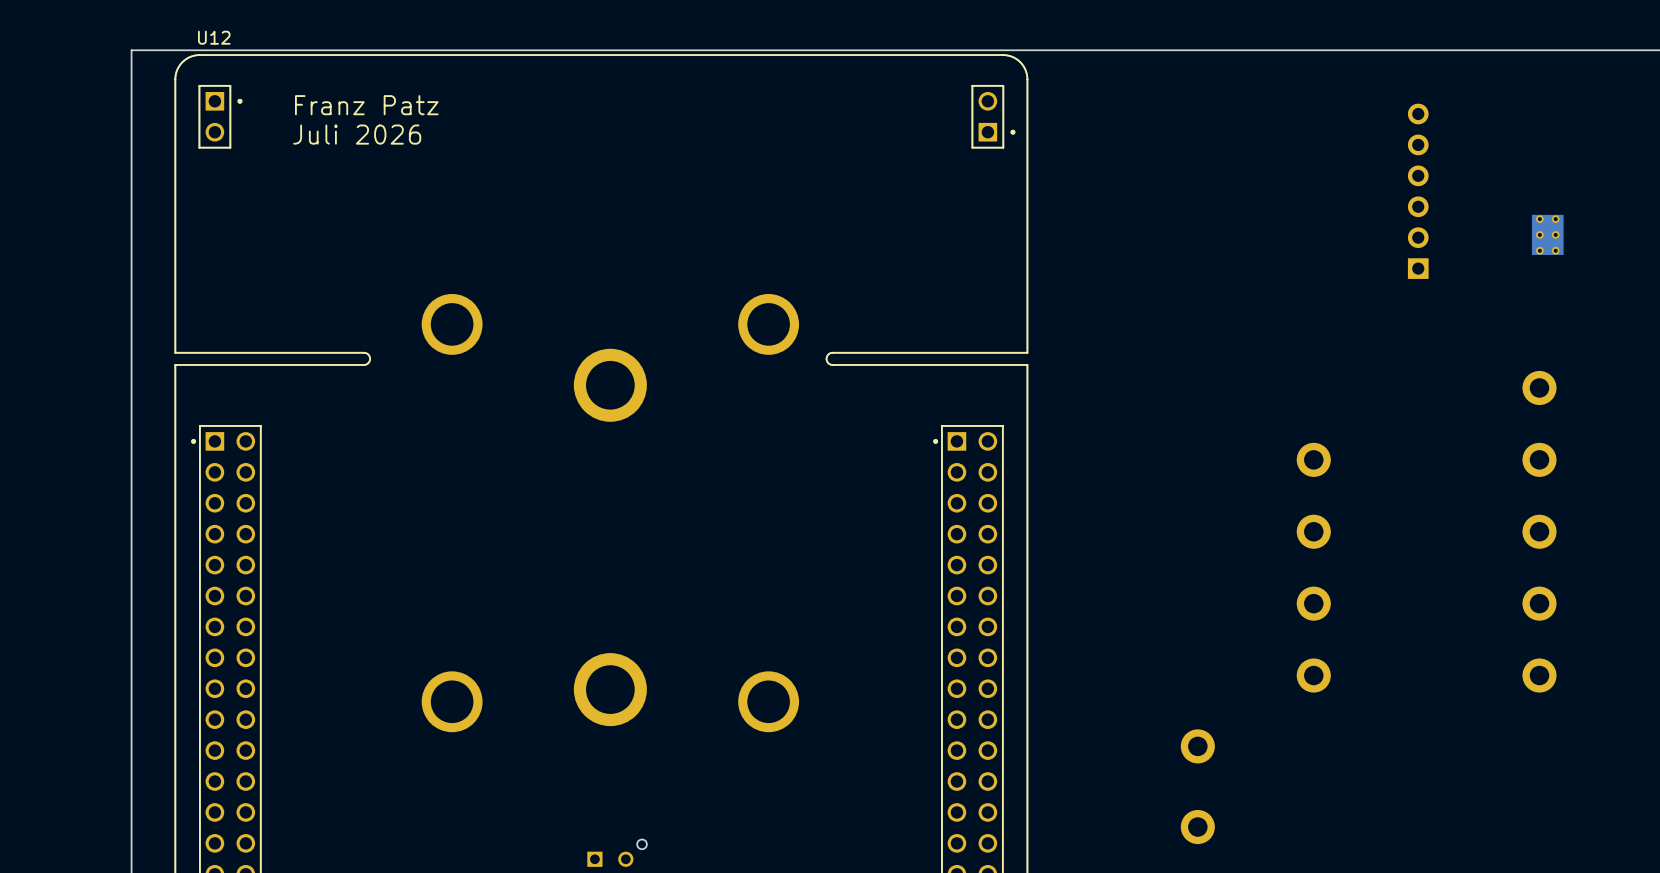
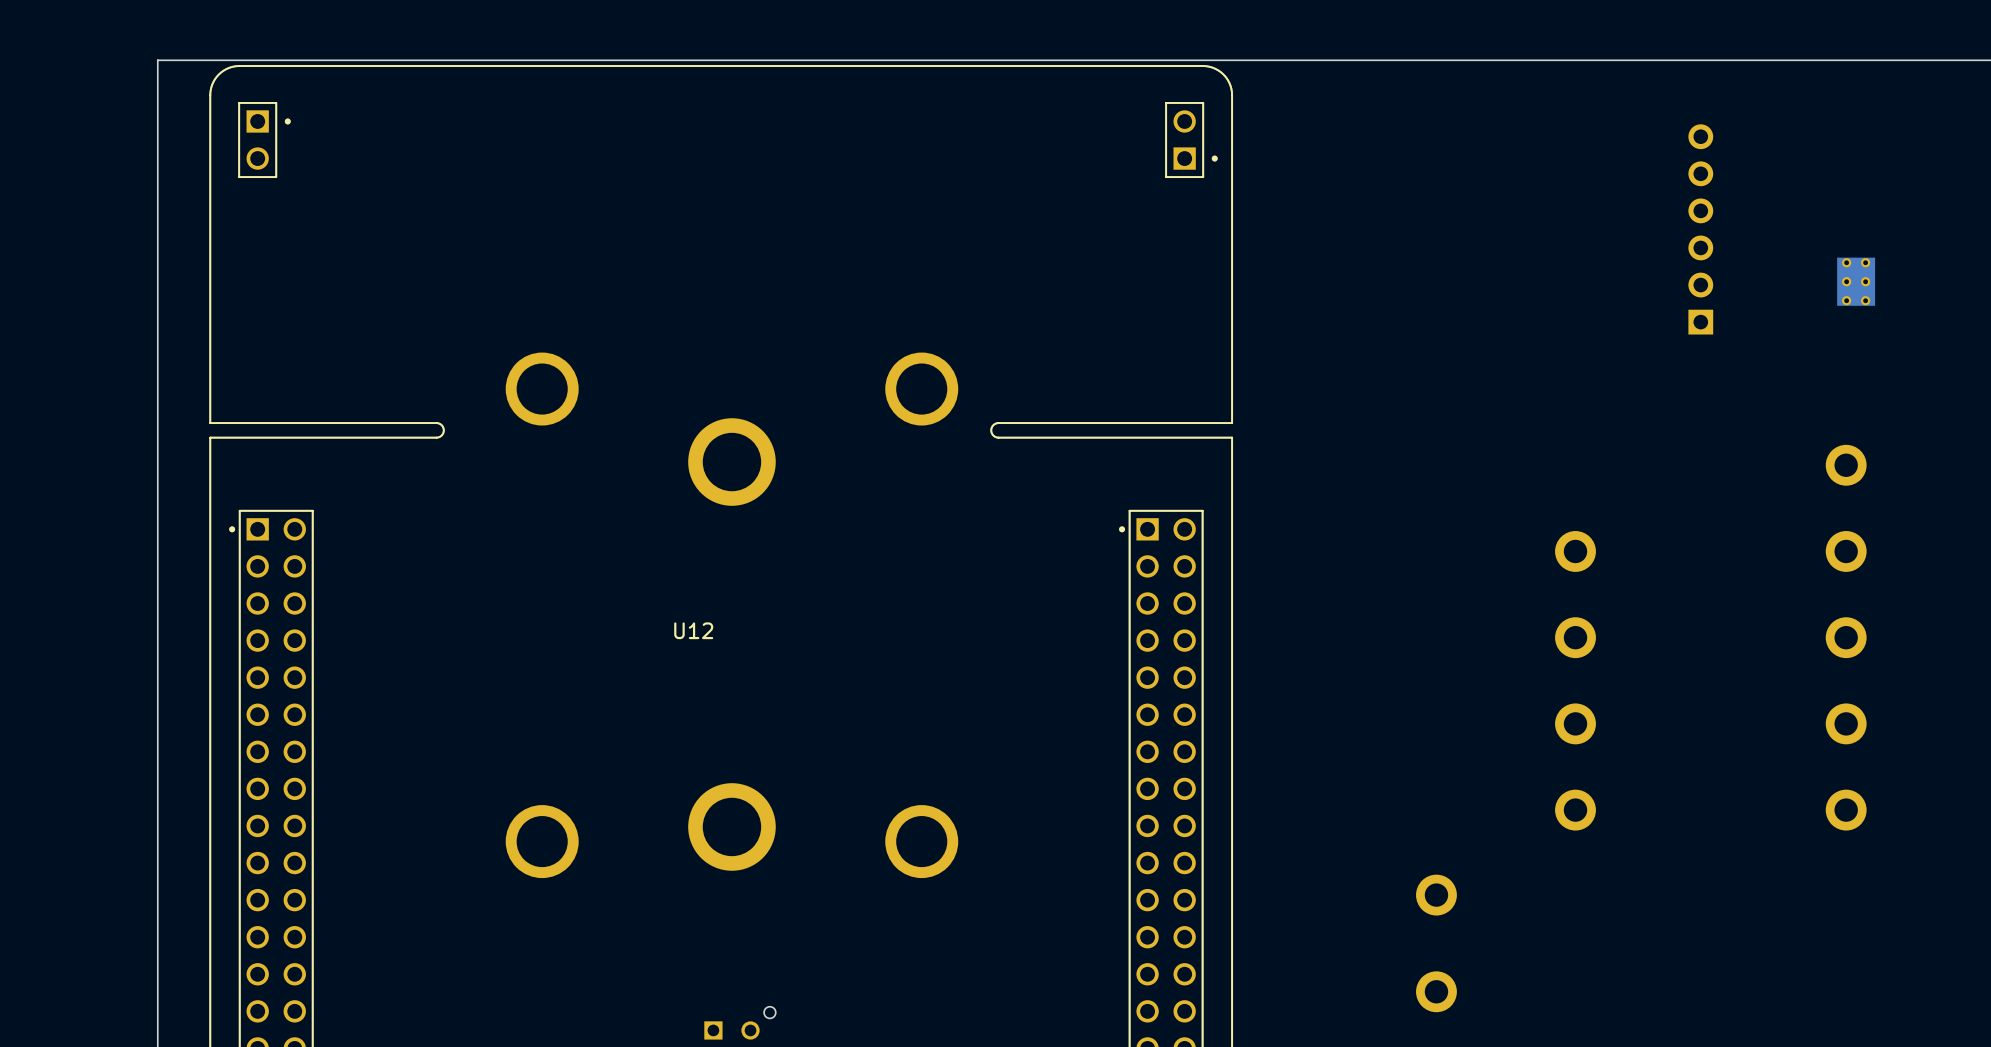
U12 name position: U12 (214, 37) -> U12 (693, 630)
text: Franz Patz (366, 105) -> none
text: Juli 2026 (357, 134) -> none

